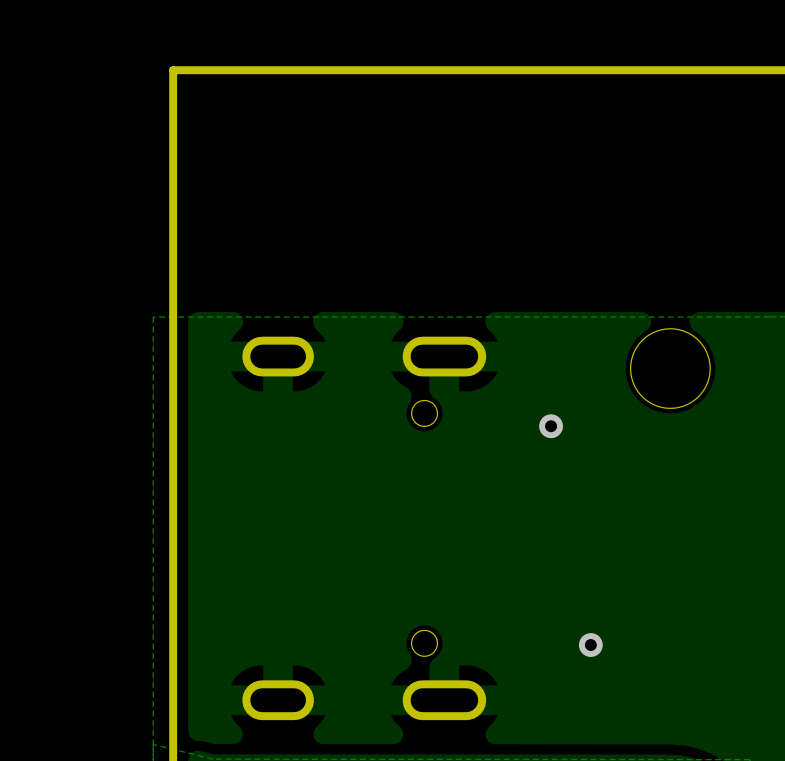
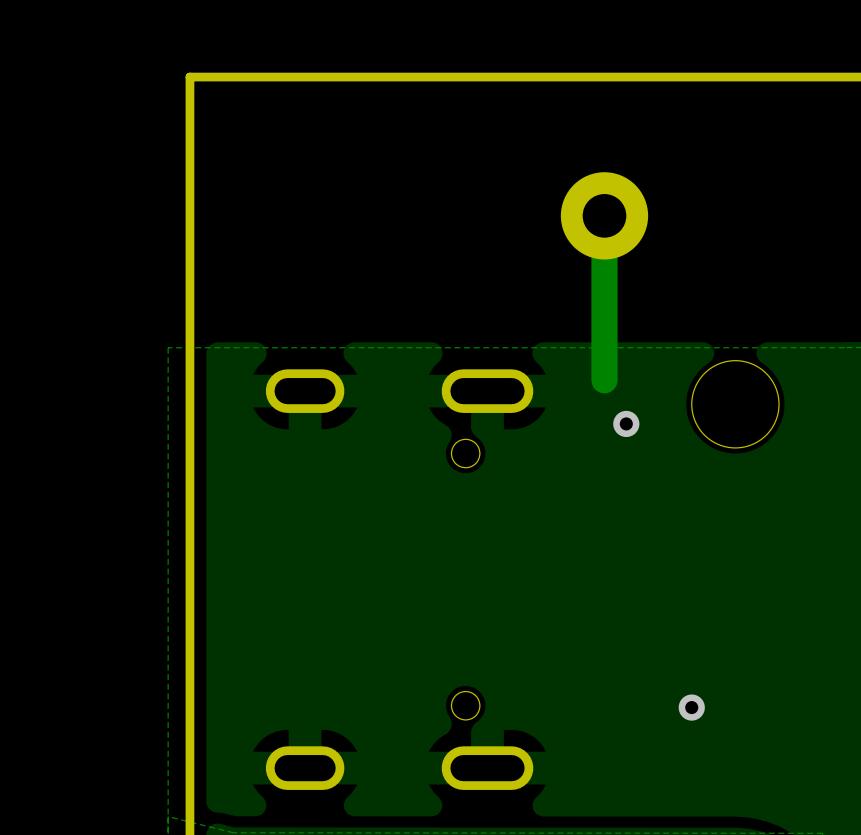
track: none -> (604, 215) (604, 380)
part: none -> (604, 215)
via position: (551, 426) -> (626, 423)
via position: (590, 645) -> (691, 707)

